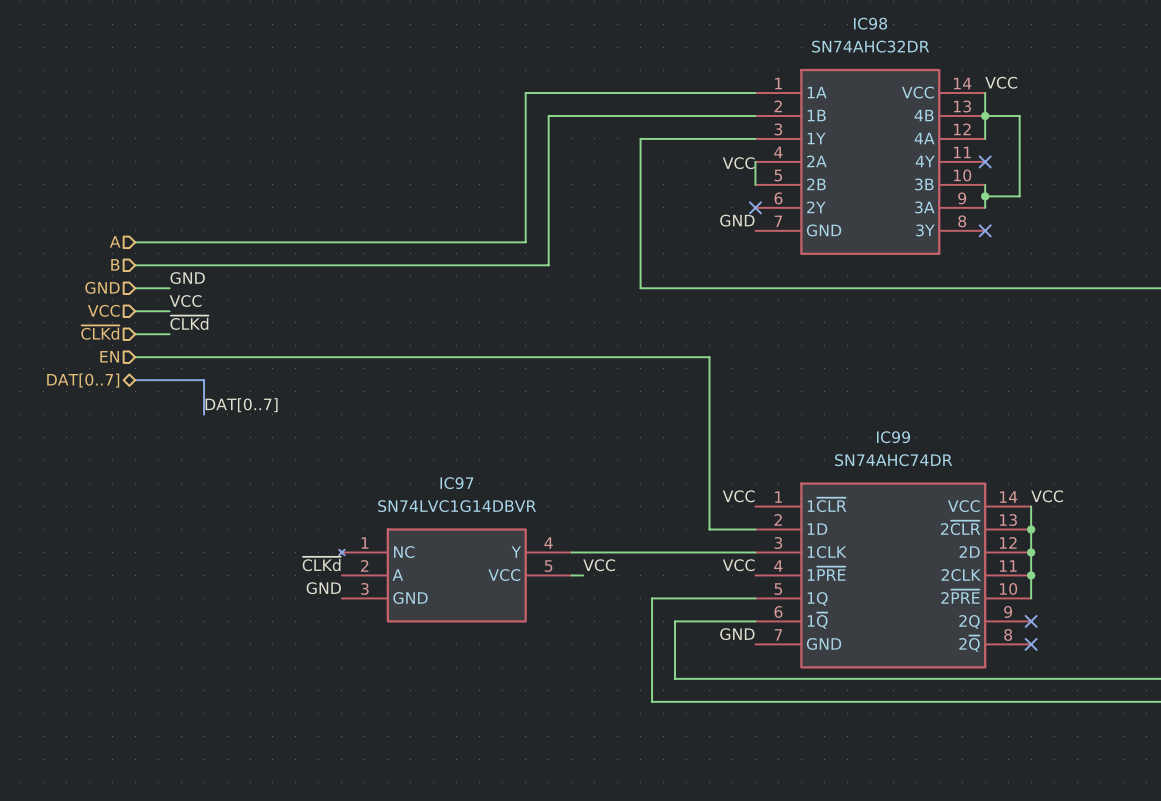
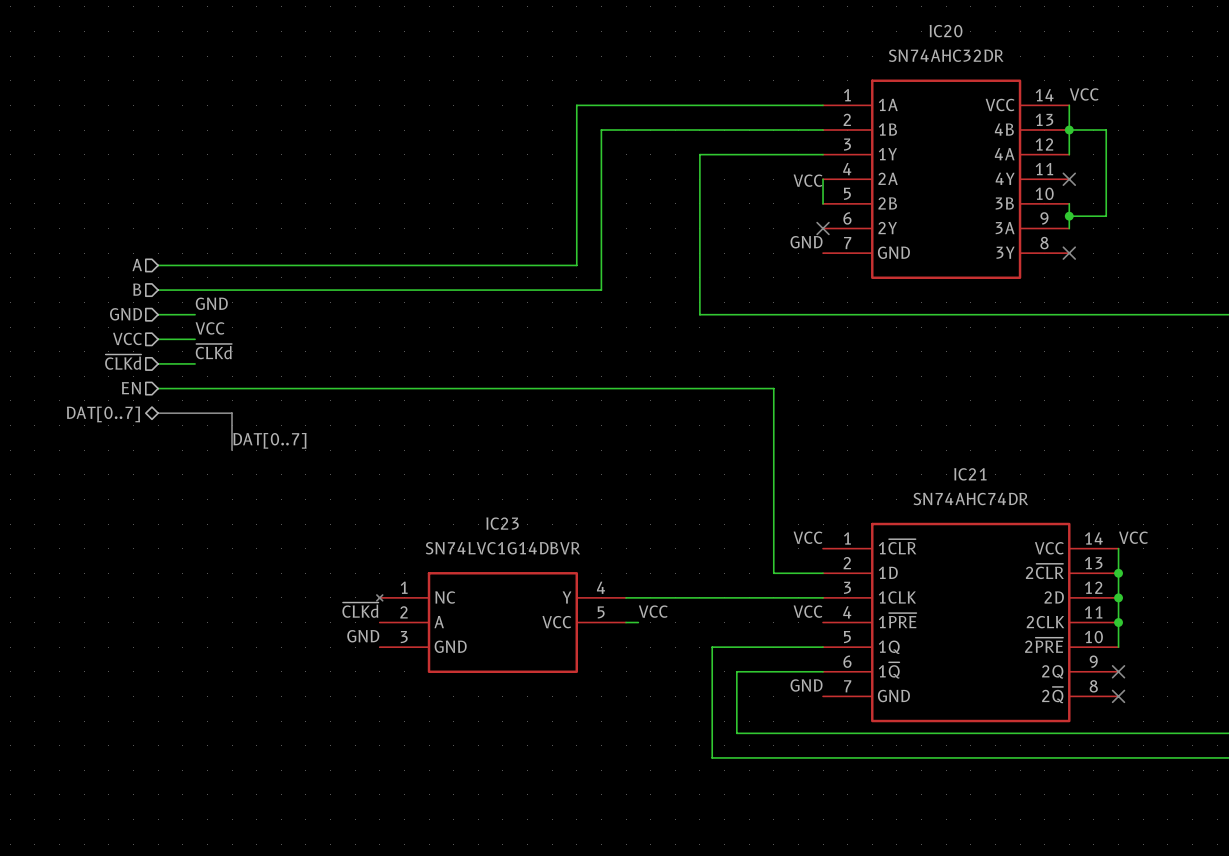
IC98 name: IC98 (870, 23) -> IC20 (946, 31)
IC99 name: IC99 (893, 437) -> IC21 (970, 474)
IC97 name: IC97 (456, 483) -> IC23 (502, 523)

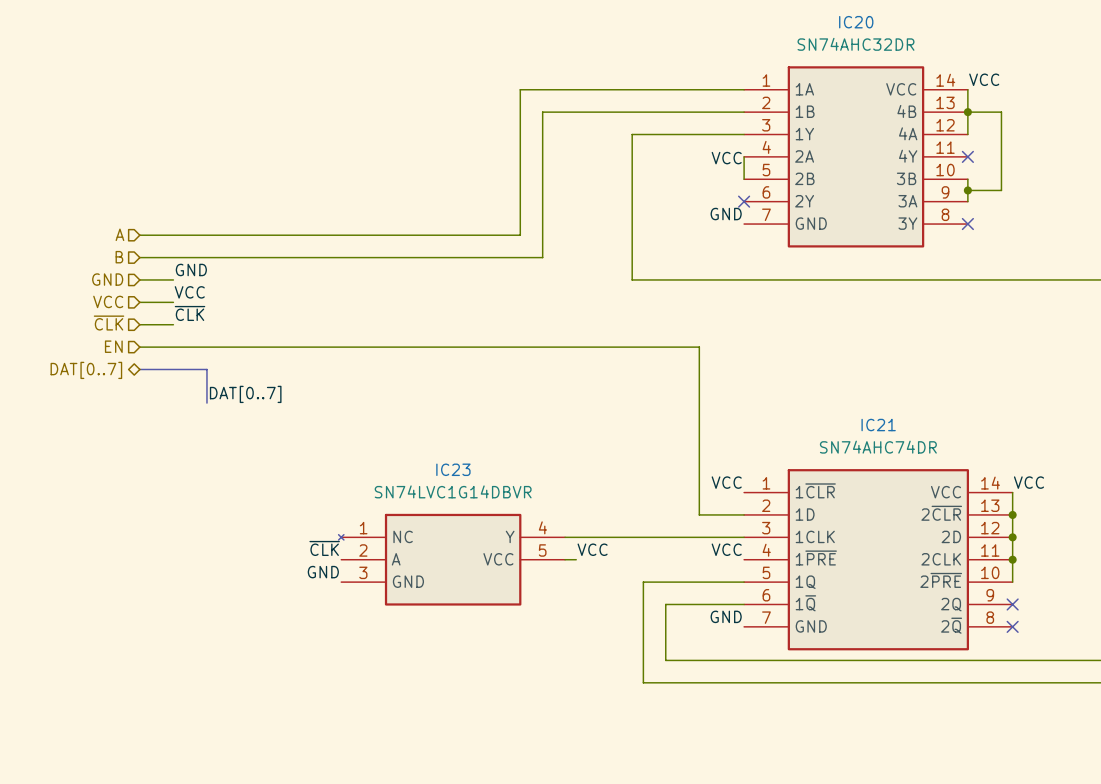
label: ~{CLKd} (213, 351) -> ~{CLK} (190, 313)
hierarchical label: ~{CLKd} (123, 362) -> ~{CLK} (109, 323)
label: ~{CLKd} (360, 610) -> ~{CLK} (324, 548)

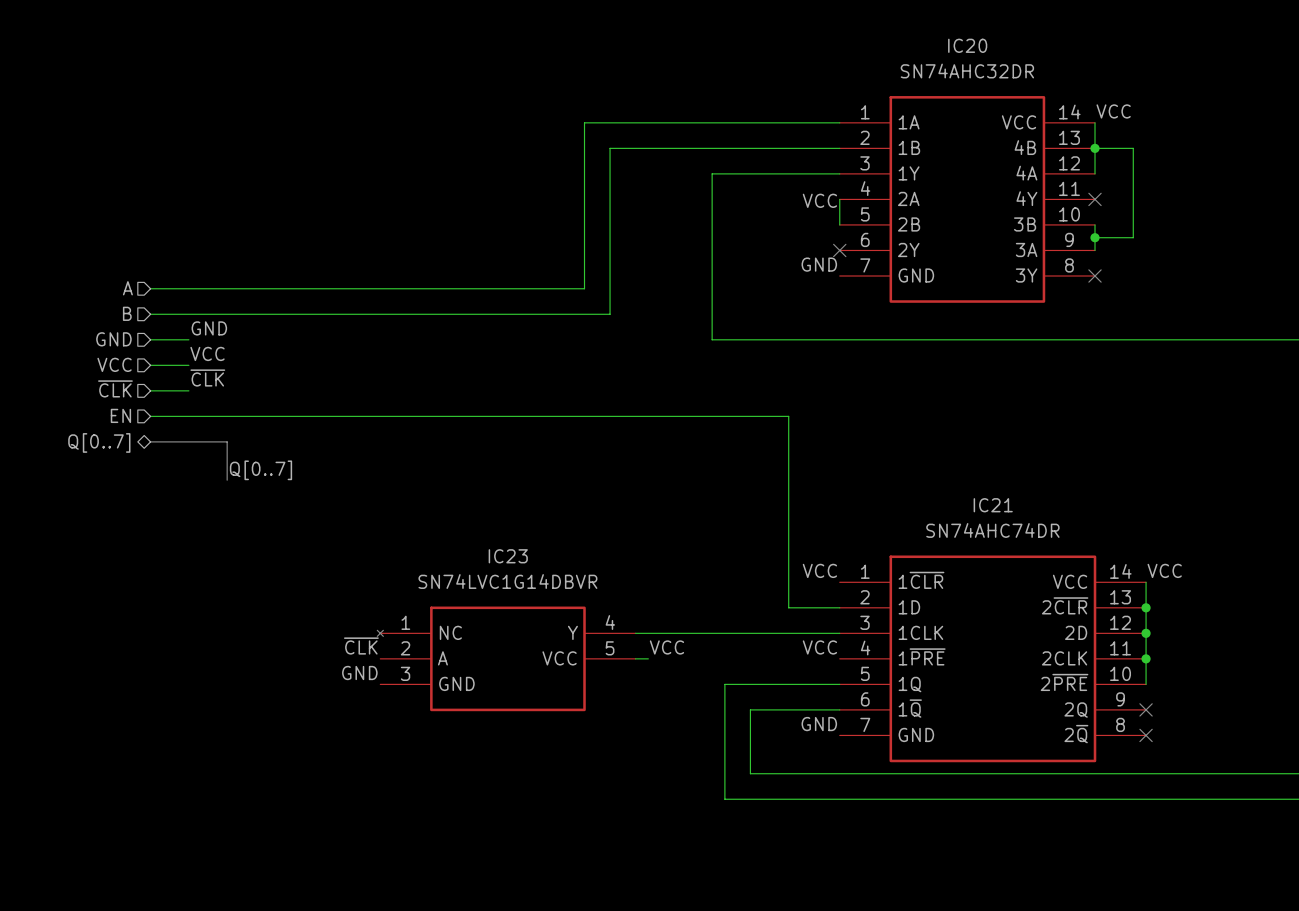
hierarchical label: DAT[0..7] (86, 370) -> Q[0..7] (99, 442)
label: DAT[0..7] (245, 394) -> Q[0..7] (260, 470)

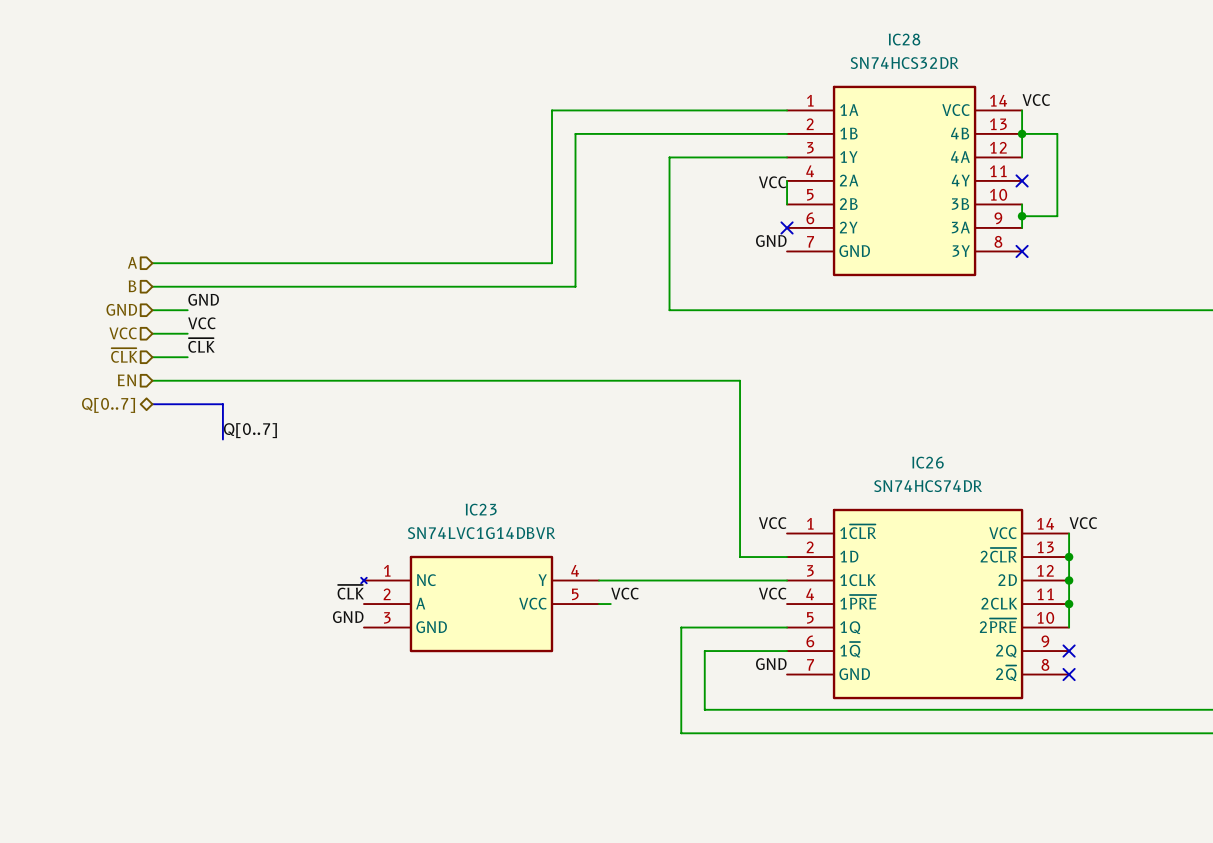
IC20 name: IC20 (967, 45) -> IC28 (904, 39)
IC20 value: SN74AHC32DR (967, 71) -> SN74HCS32DR (904, 63)
IC21 name: IC21 (993, 505) -> IC26 (928, 462)
IC21 value: SN74AHC74DR (992, 530) -> SN74HCS74DR (928, 486)

